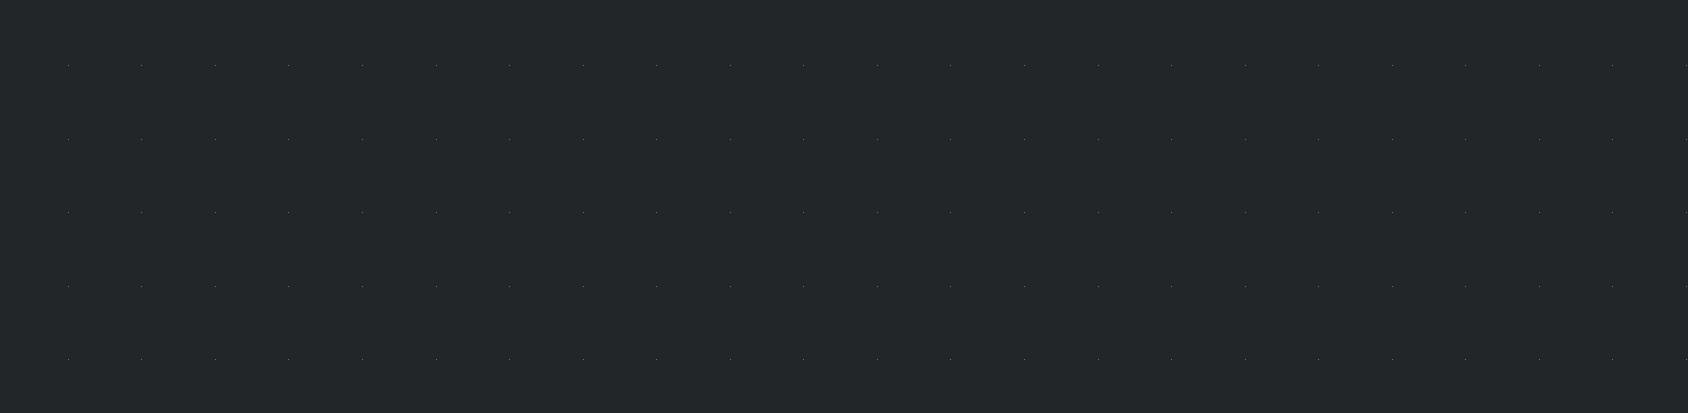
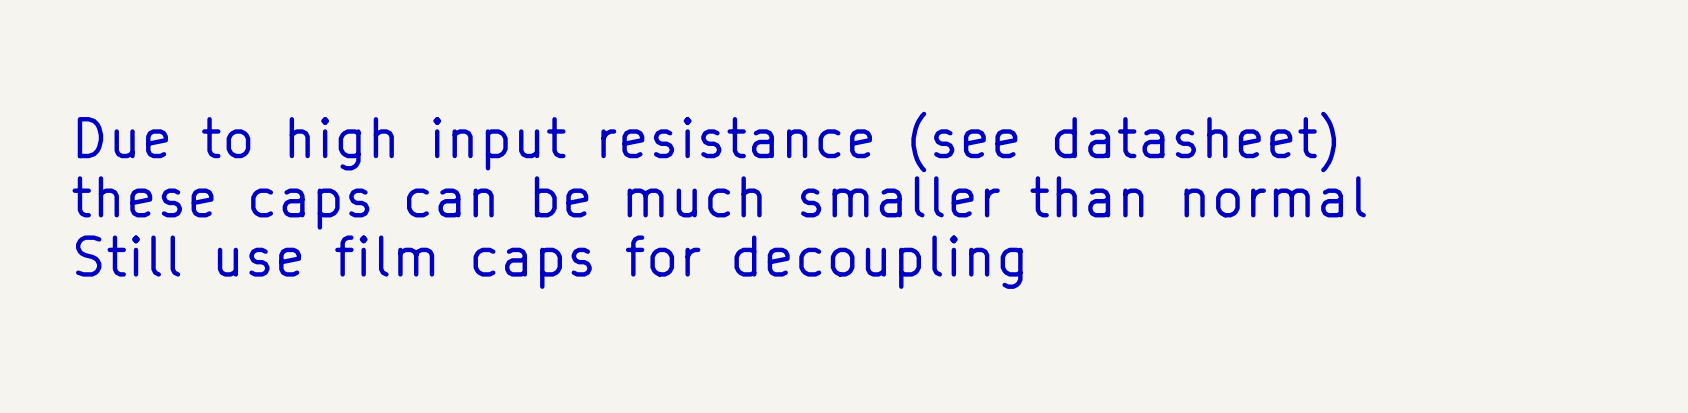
text: none -> Due to high input resistance (see datasheet) (706, 142)
text: none -> these caps can be much smaller than normal (719, 202)
text: none -> Still use film caps for decoupling (549, 262)

